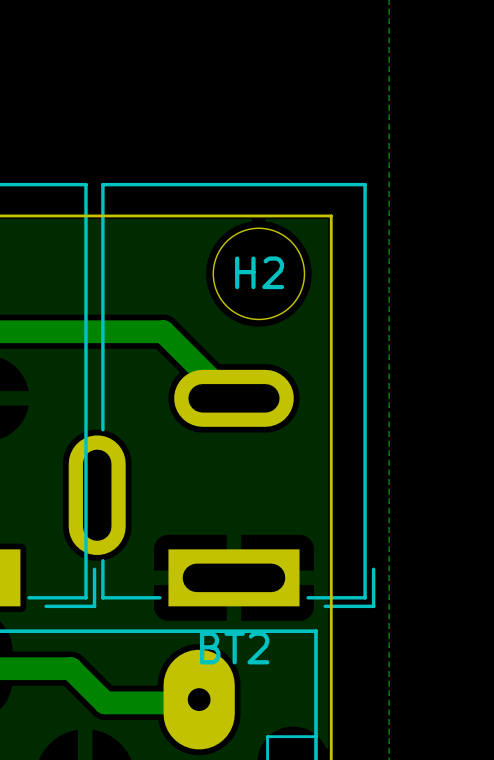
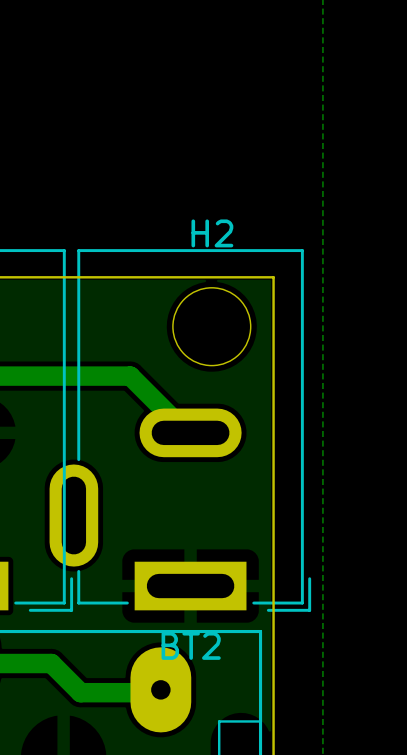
H2 name position: H2 (259, 272) -> H2 (212, 233)

